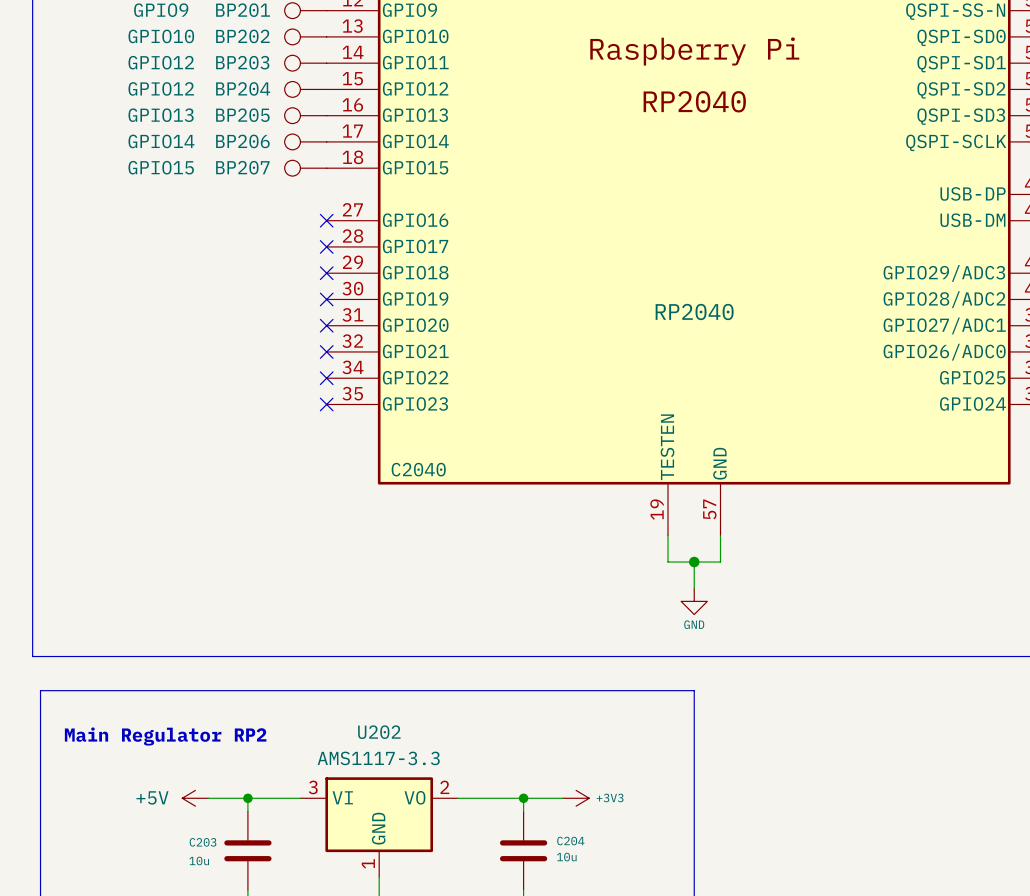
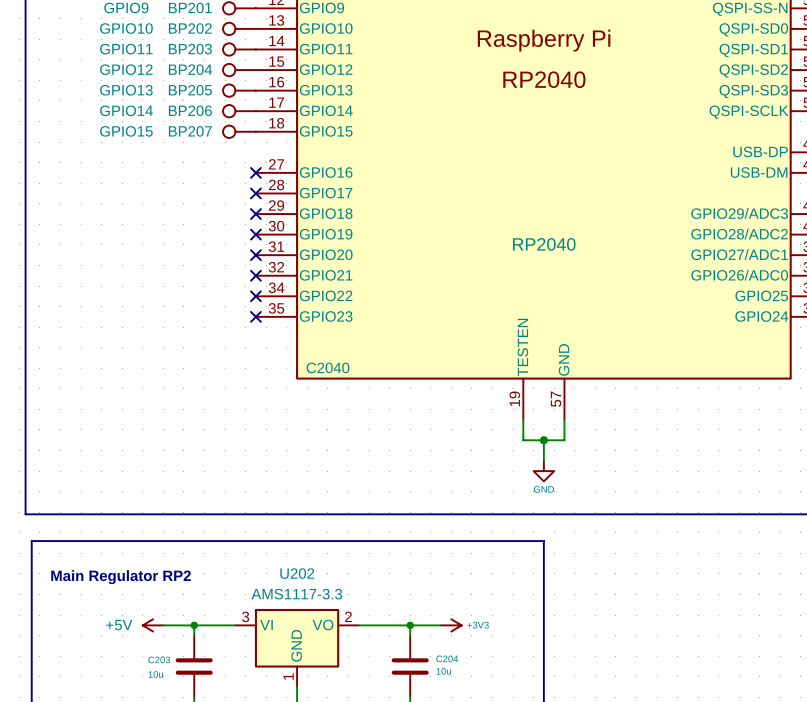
BP203 value: GPIO12 (161, 62) -> GPIO11 (126, 49)

